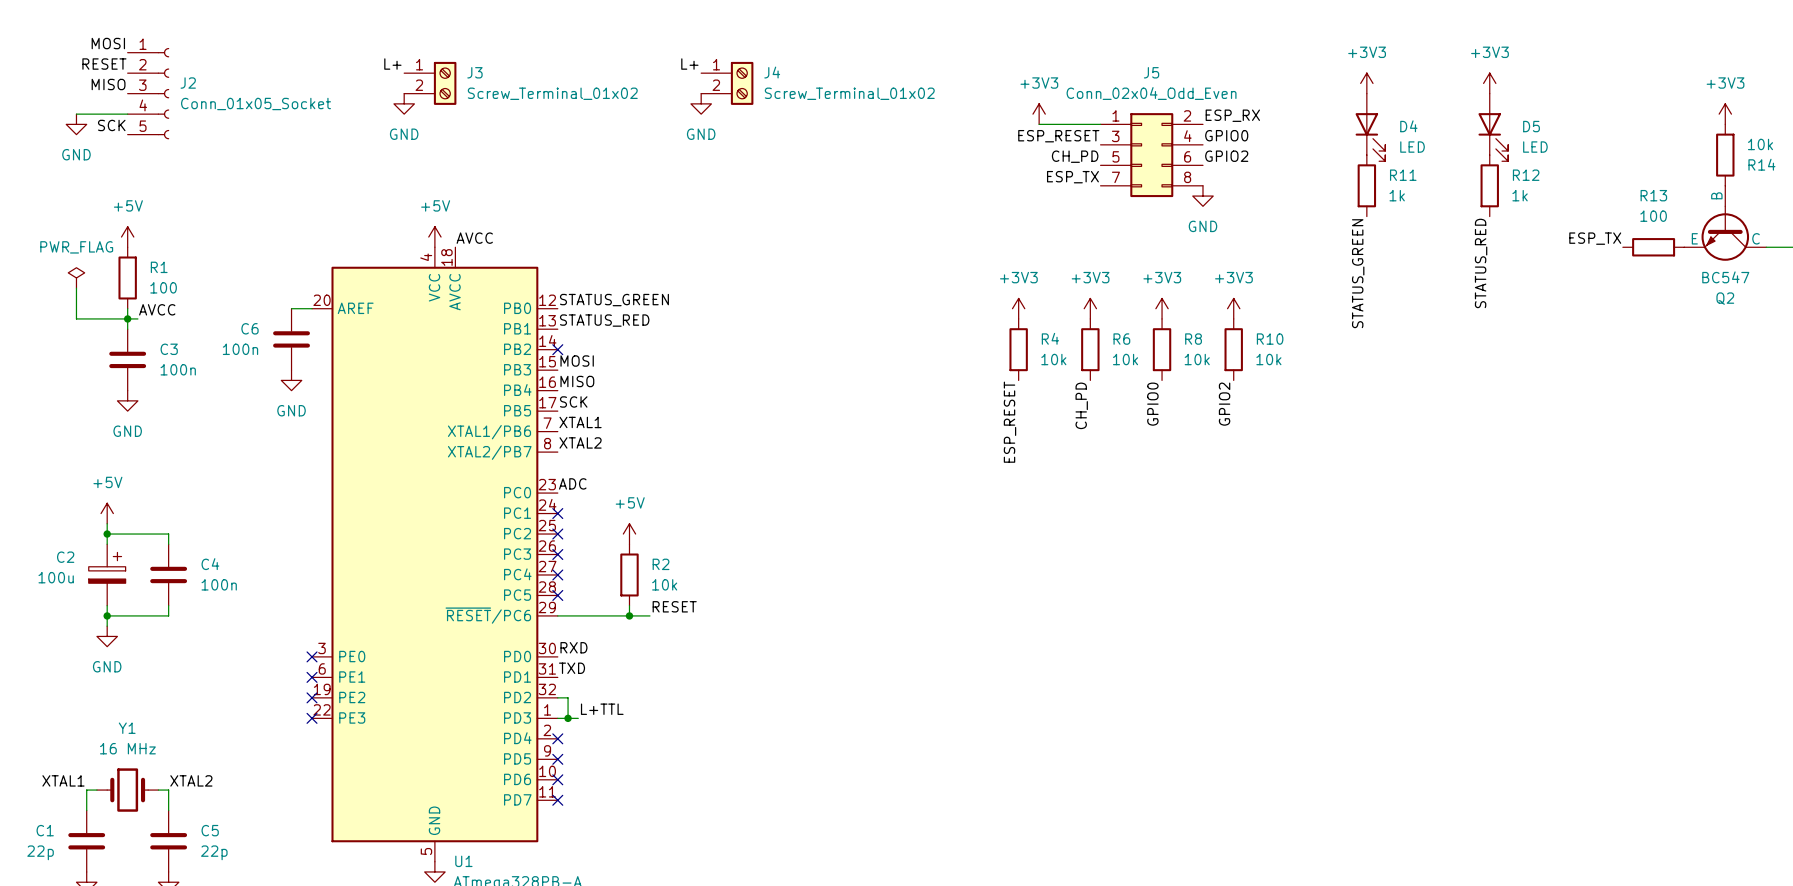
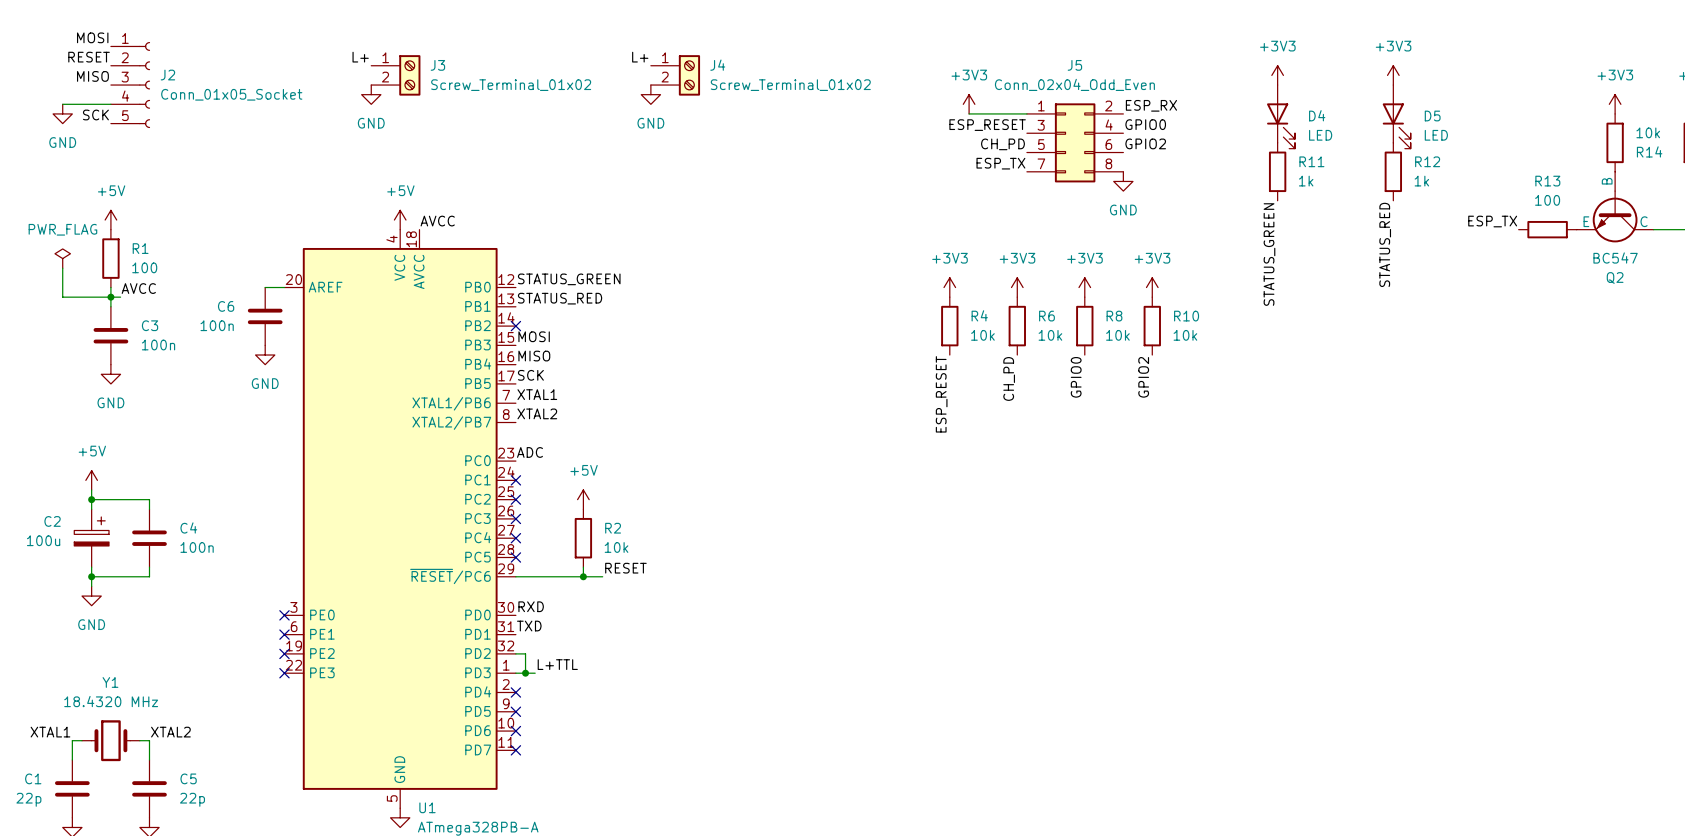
Y1 value: 16 MHz (127, 748) -> 18.4320 MHz (111, 701)

